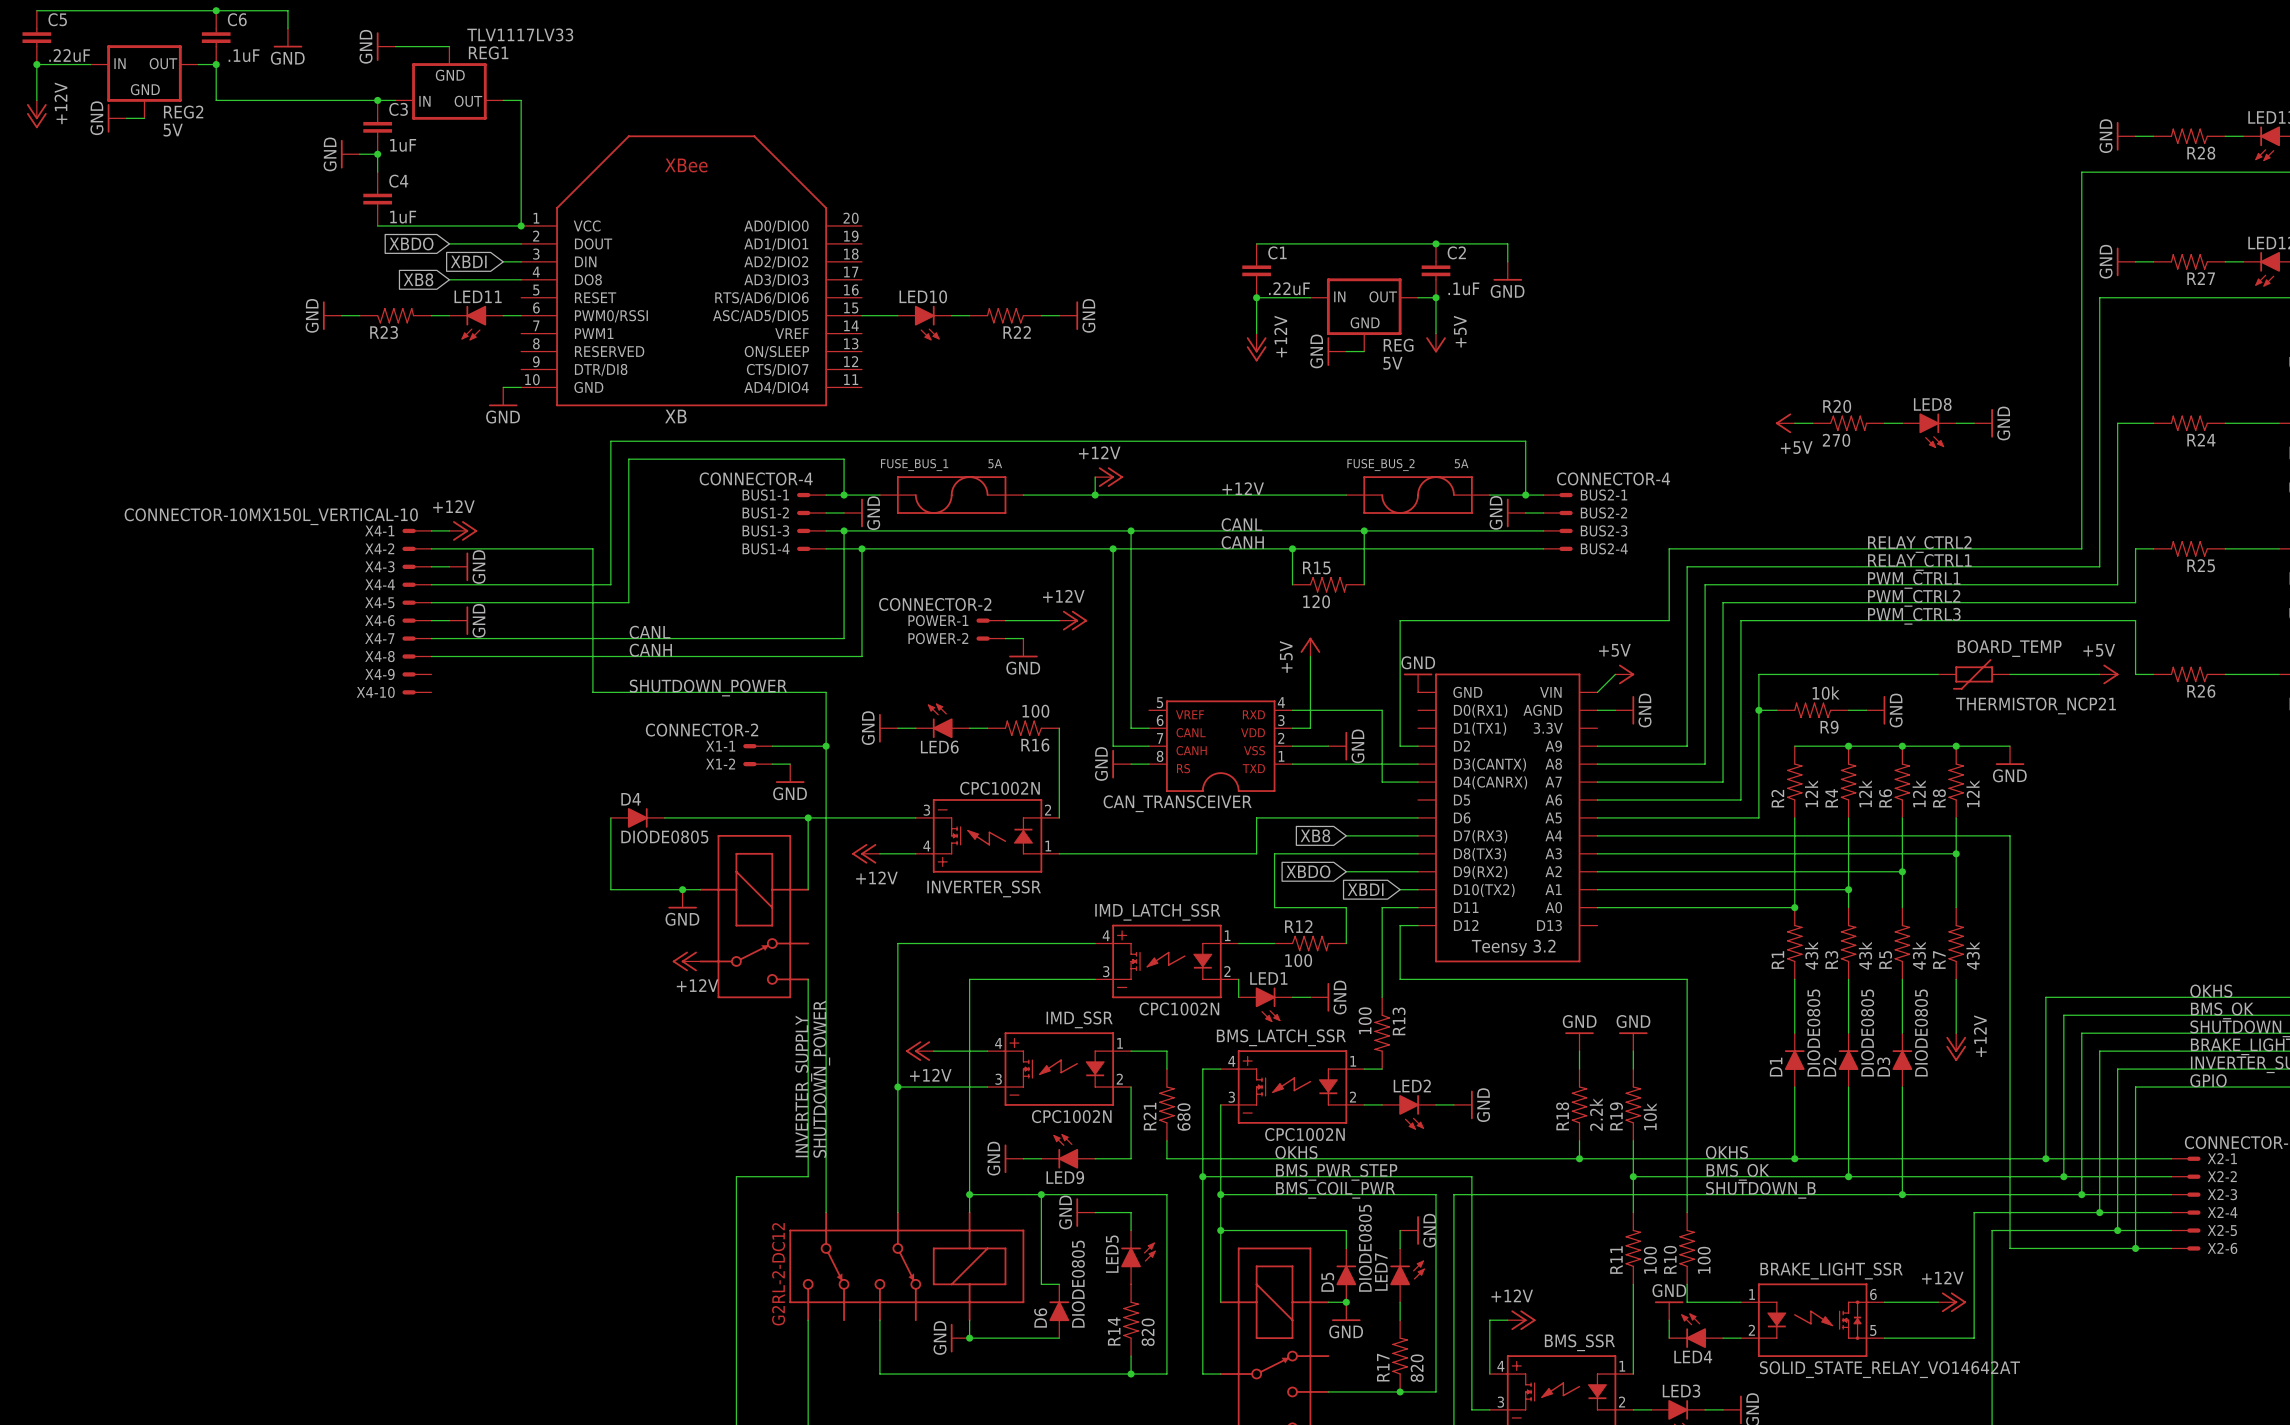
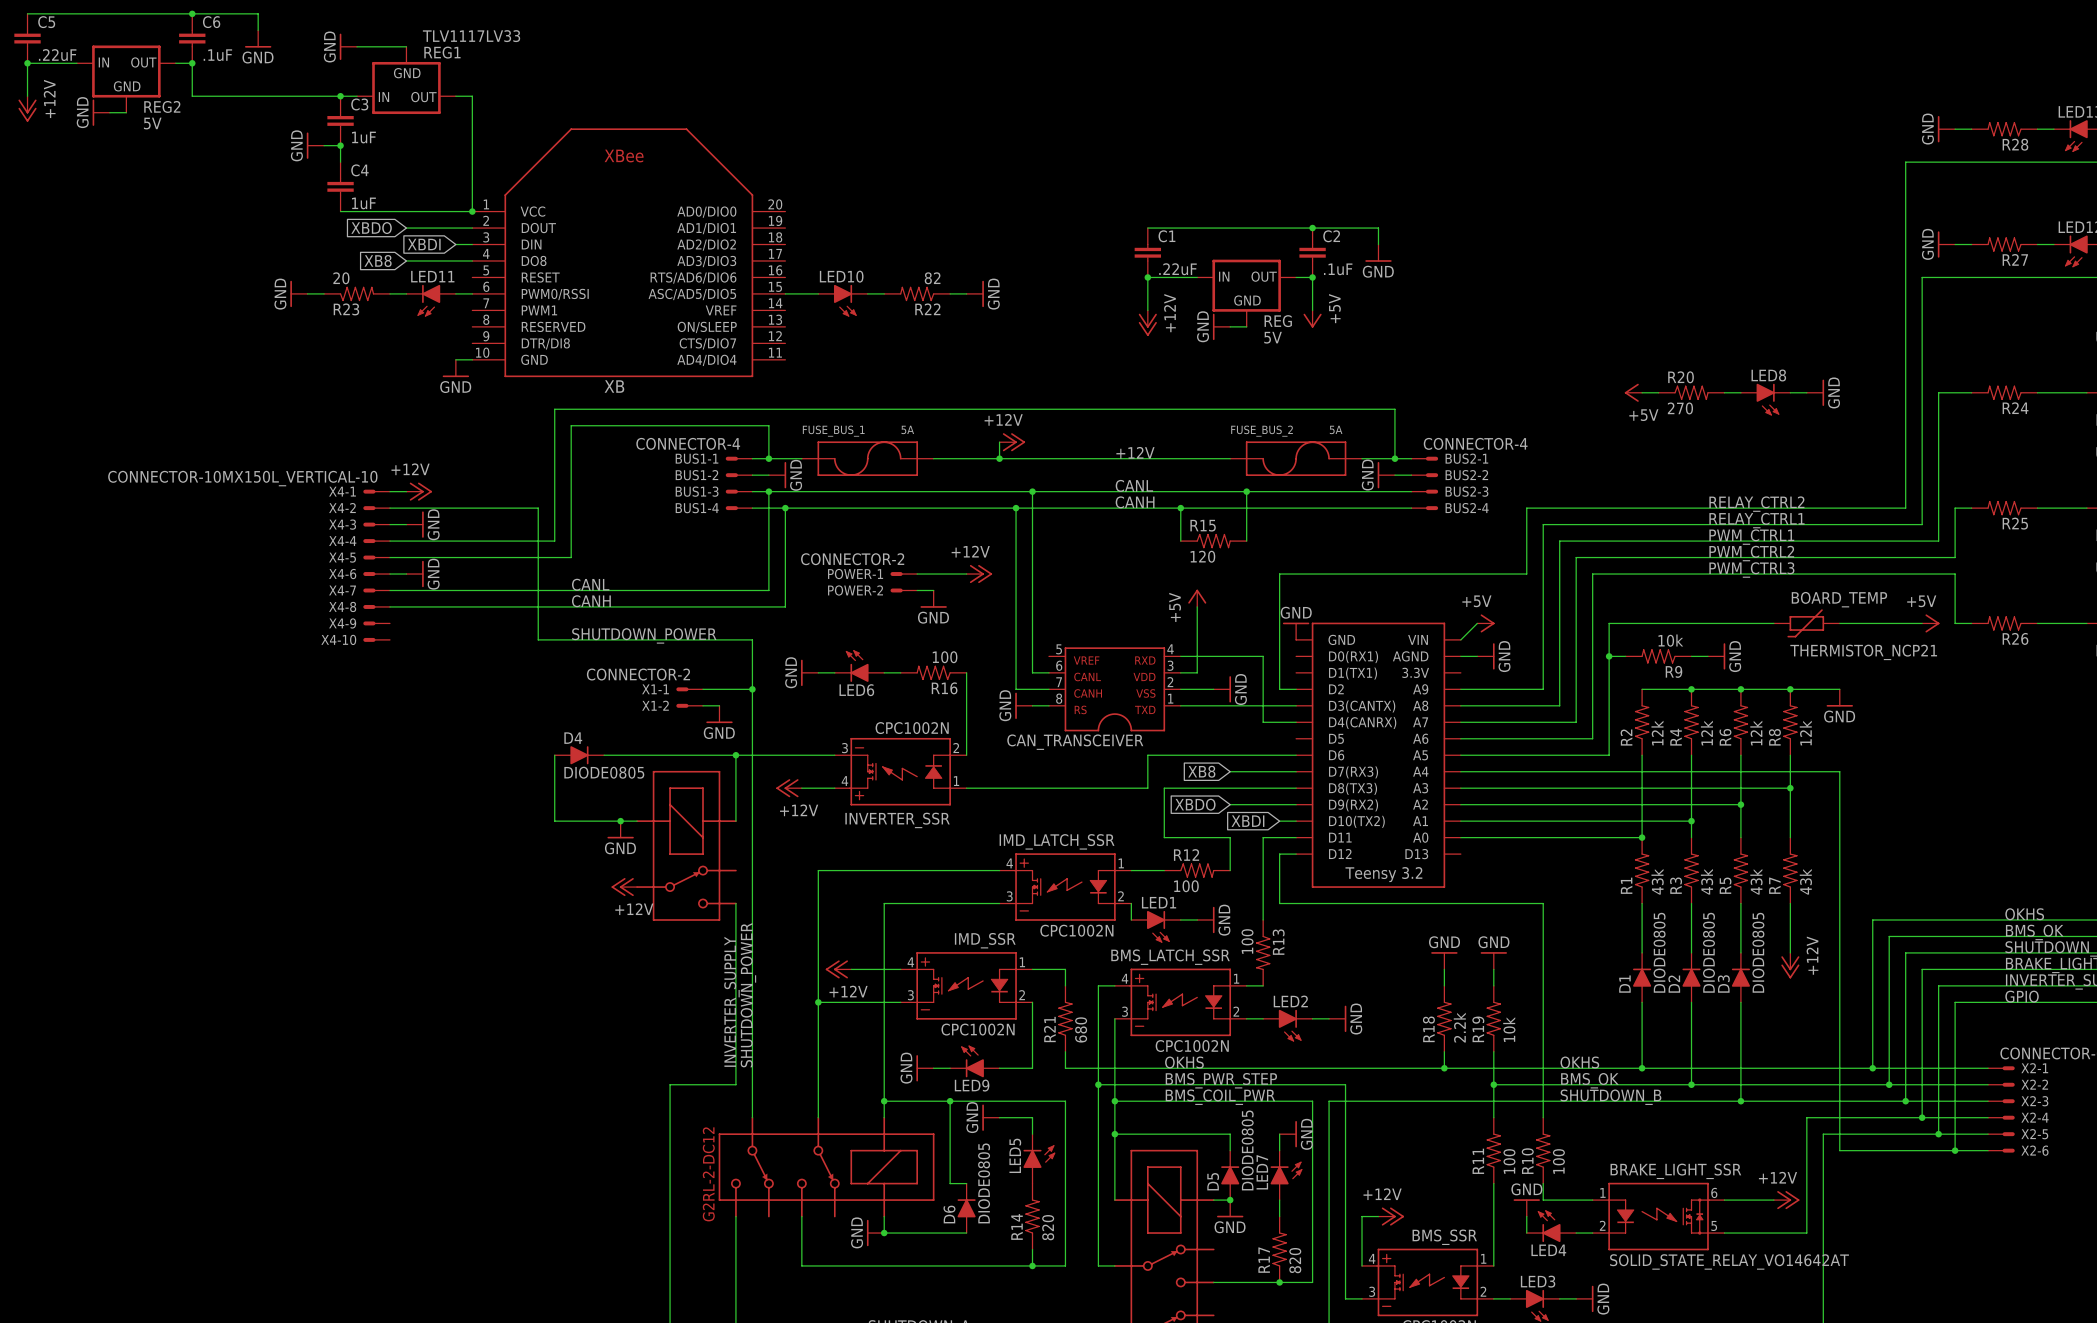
R23 value: none -> 20 (341, 278)
R22 value: none -> 82 (932, 278)

